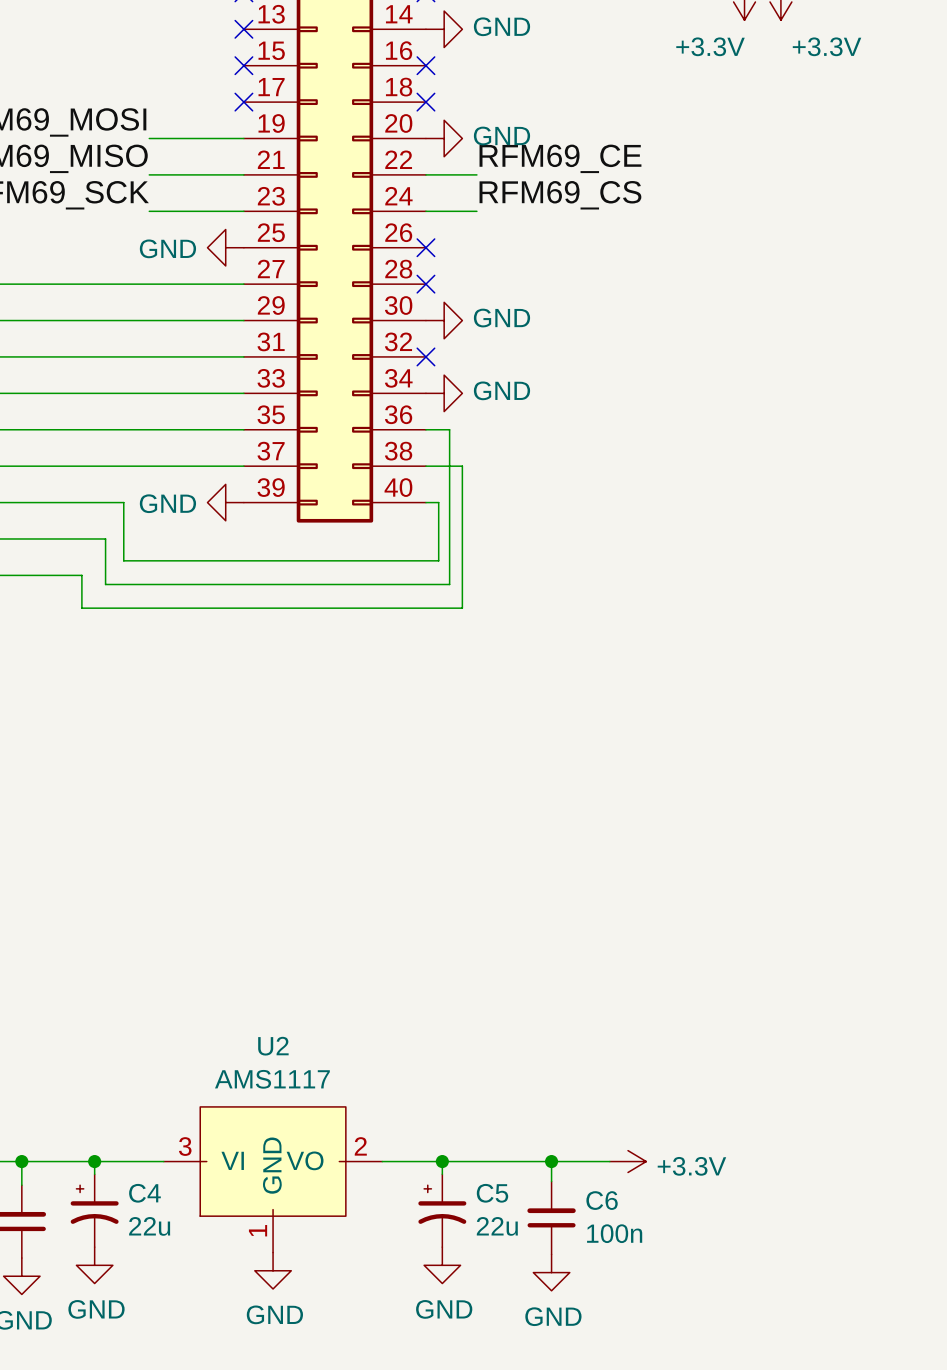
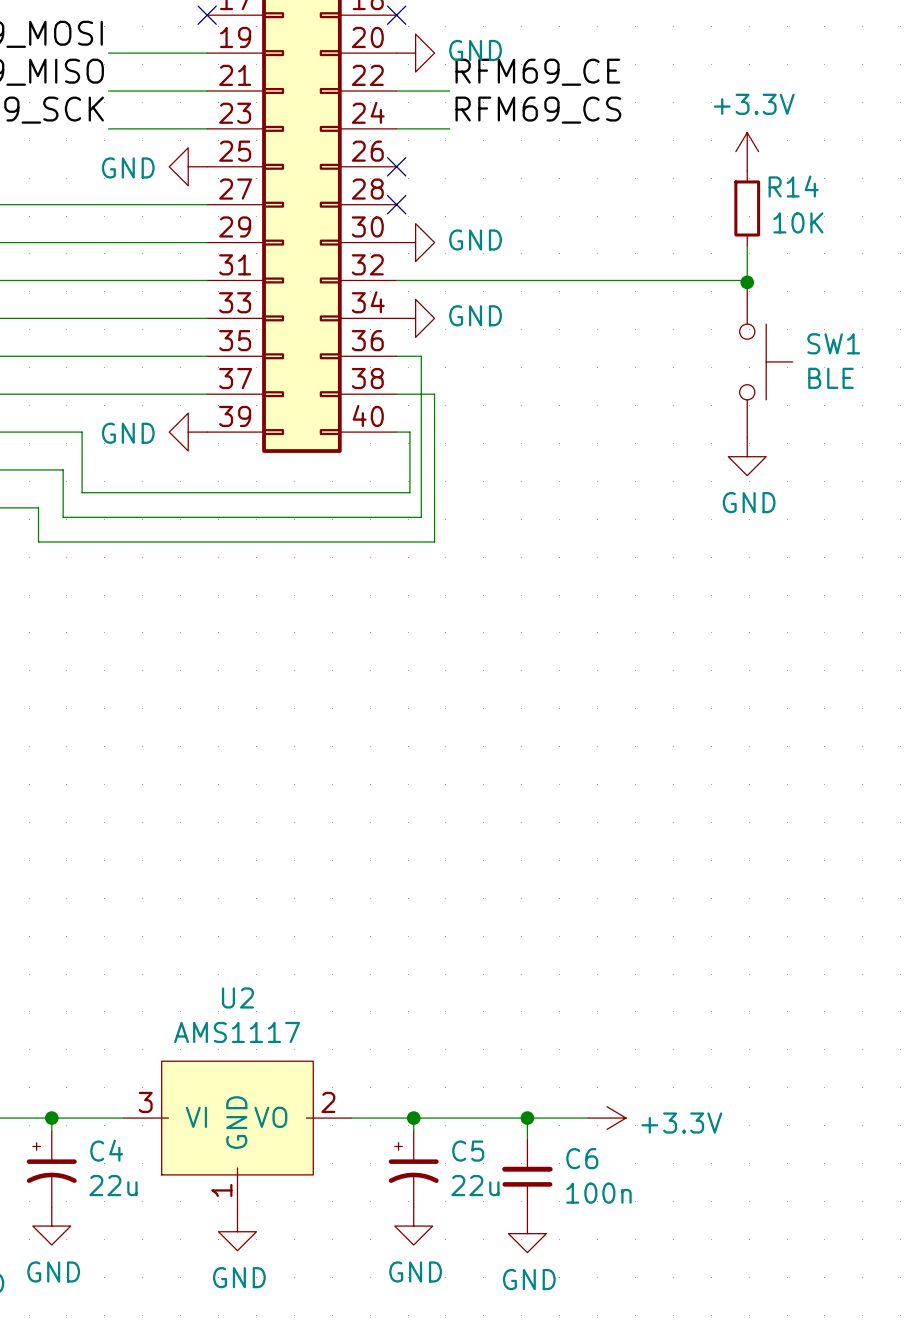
power symbol: none -> +3.3V (747, 151)
R14: none -> 10K (747, 208)
wire: none -> (747, 246) (747, 286)
wire: none -> (396, 280) (747, 280)
no-connect mark: (425, 356) -> none
junction: none -> (747, 282)
SW1: none -> BLE (766, 361)
power symbol: none -> GND (747, 456)

